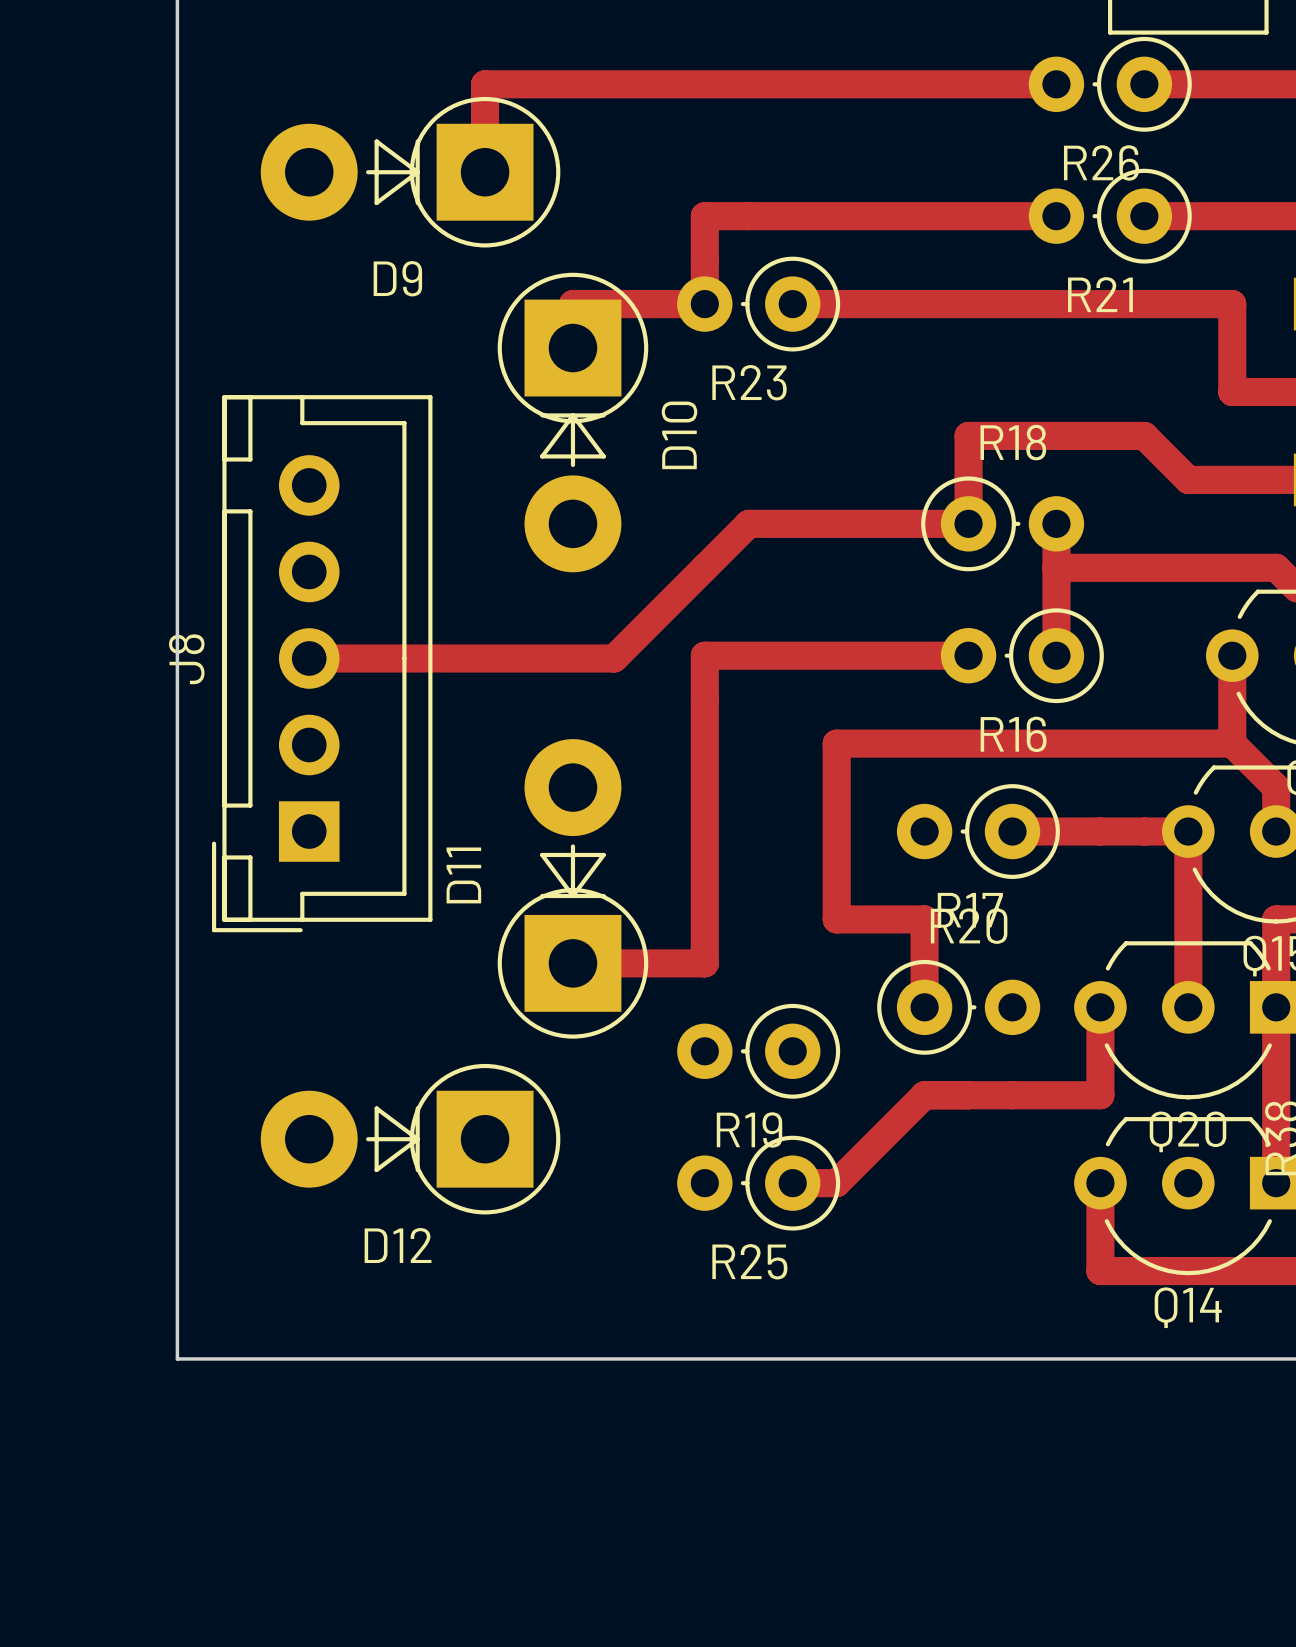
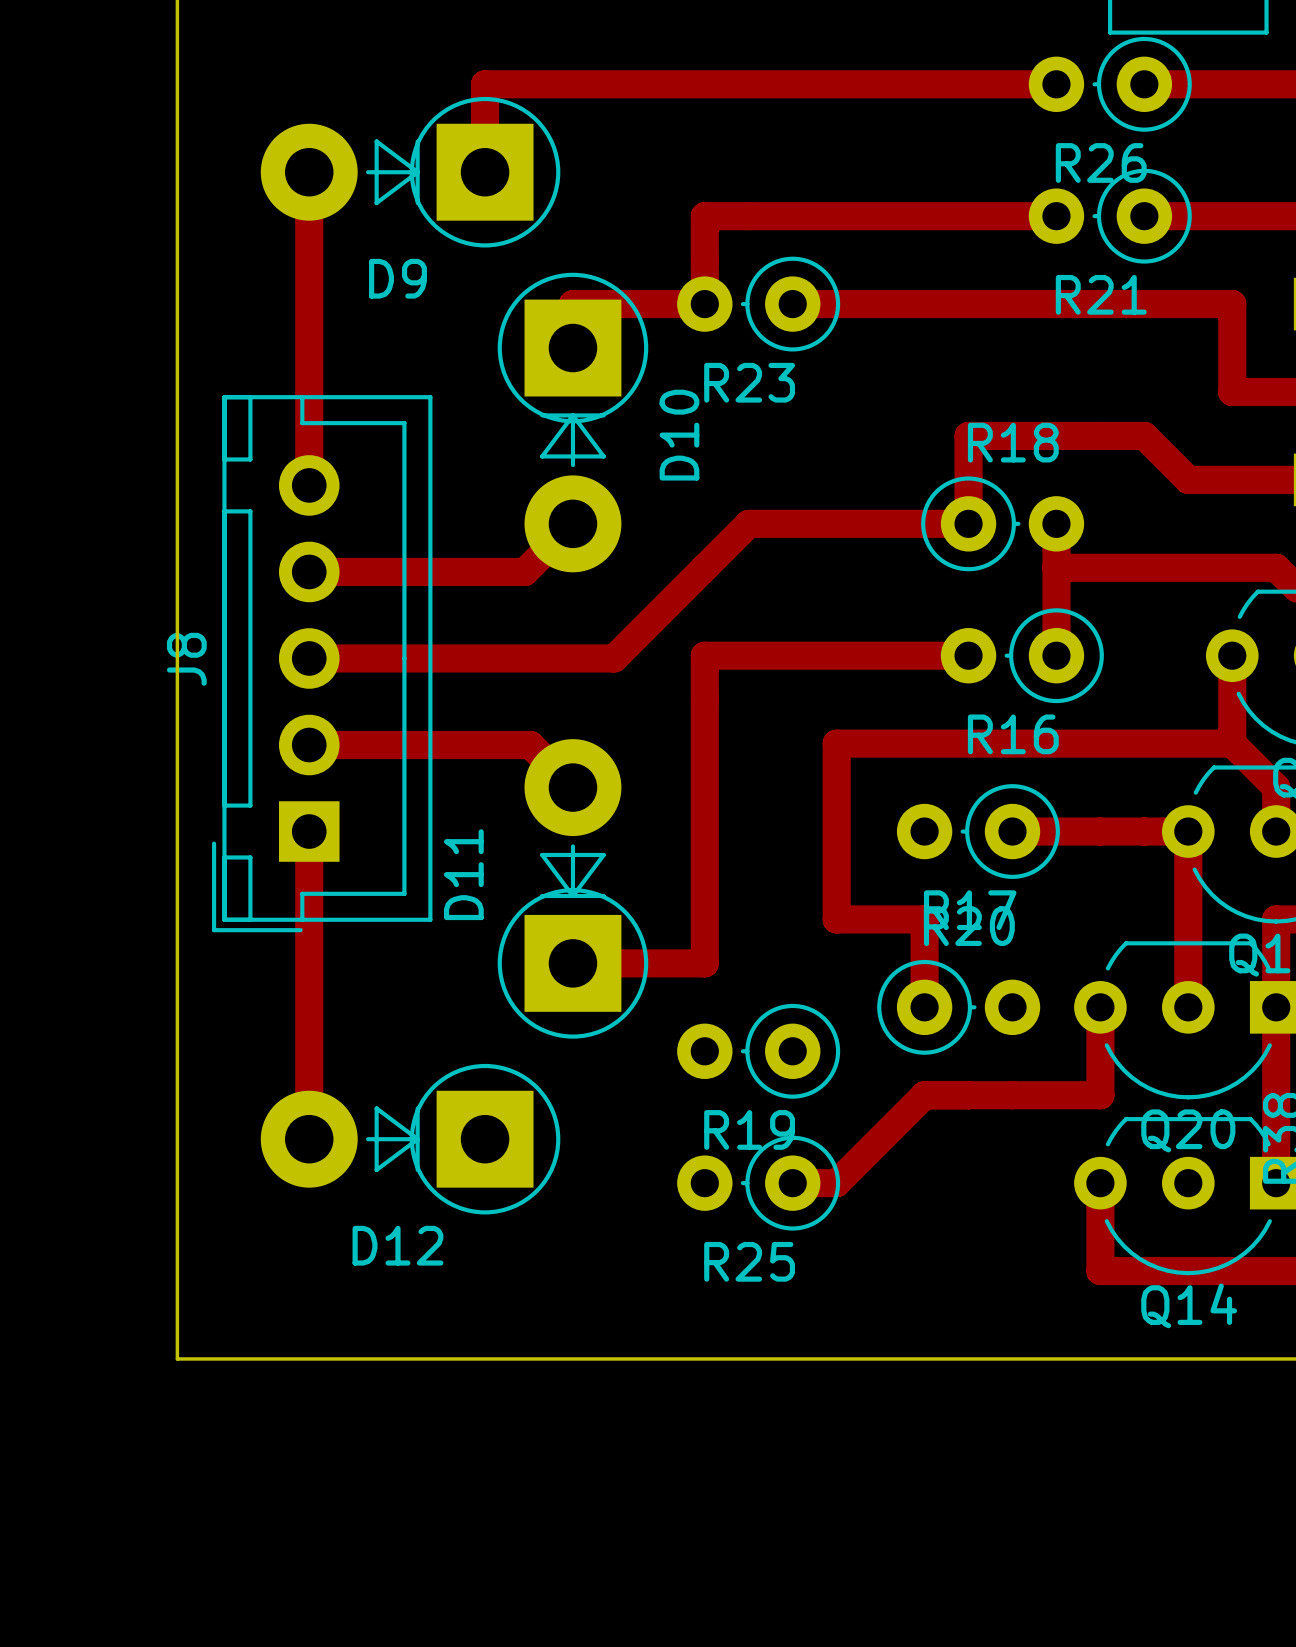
track: none -> (309, 172) (309, 485)
track: none -> (572, 523) (524, 571) (309, 571)
track: none -> (309, 745) (530, 745) (572, 787)
track: none -> (309, 831) (309, 1139)

